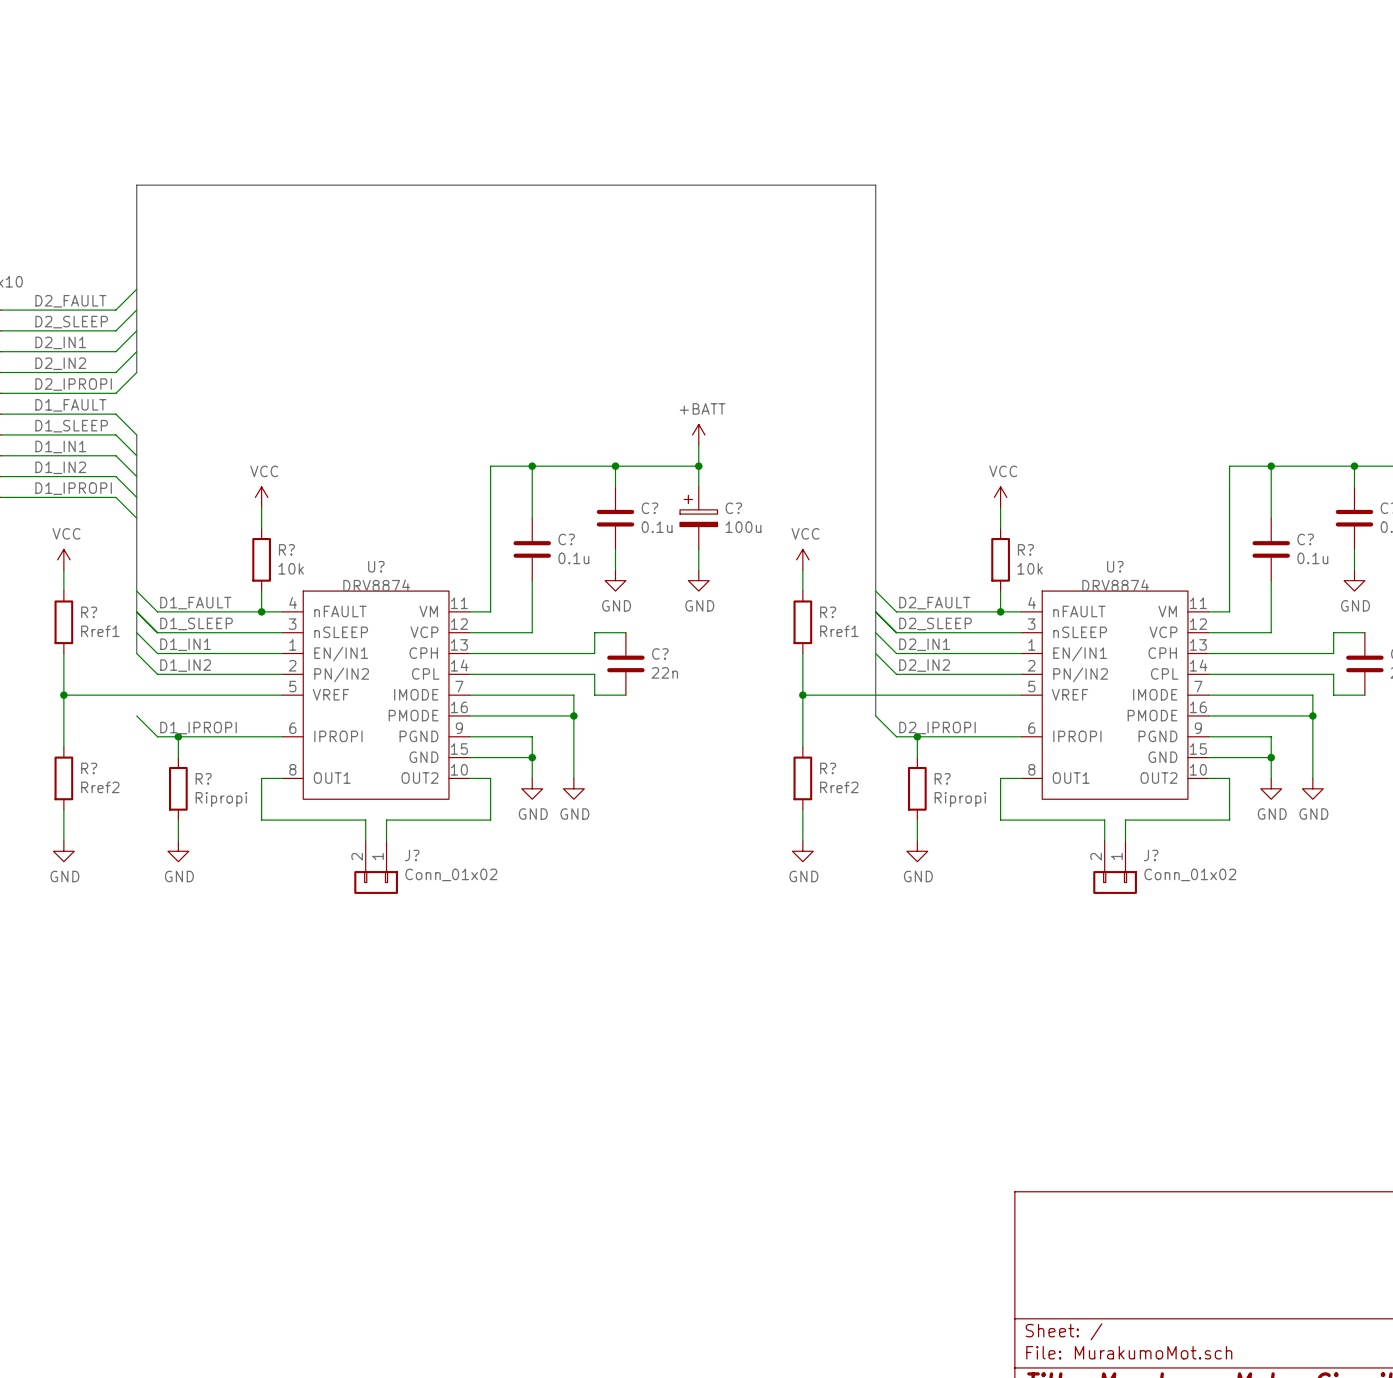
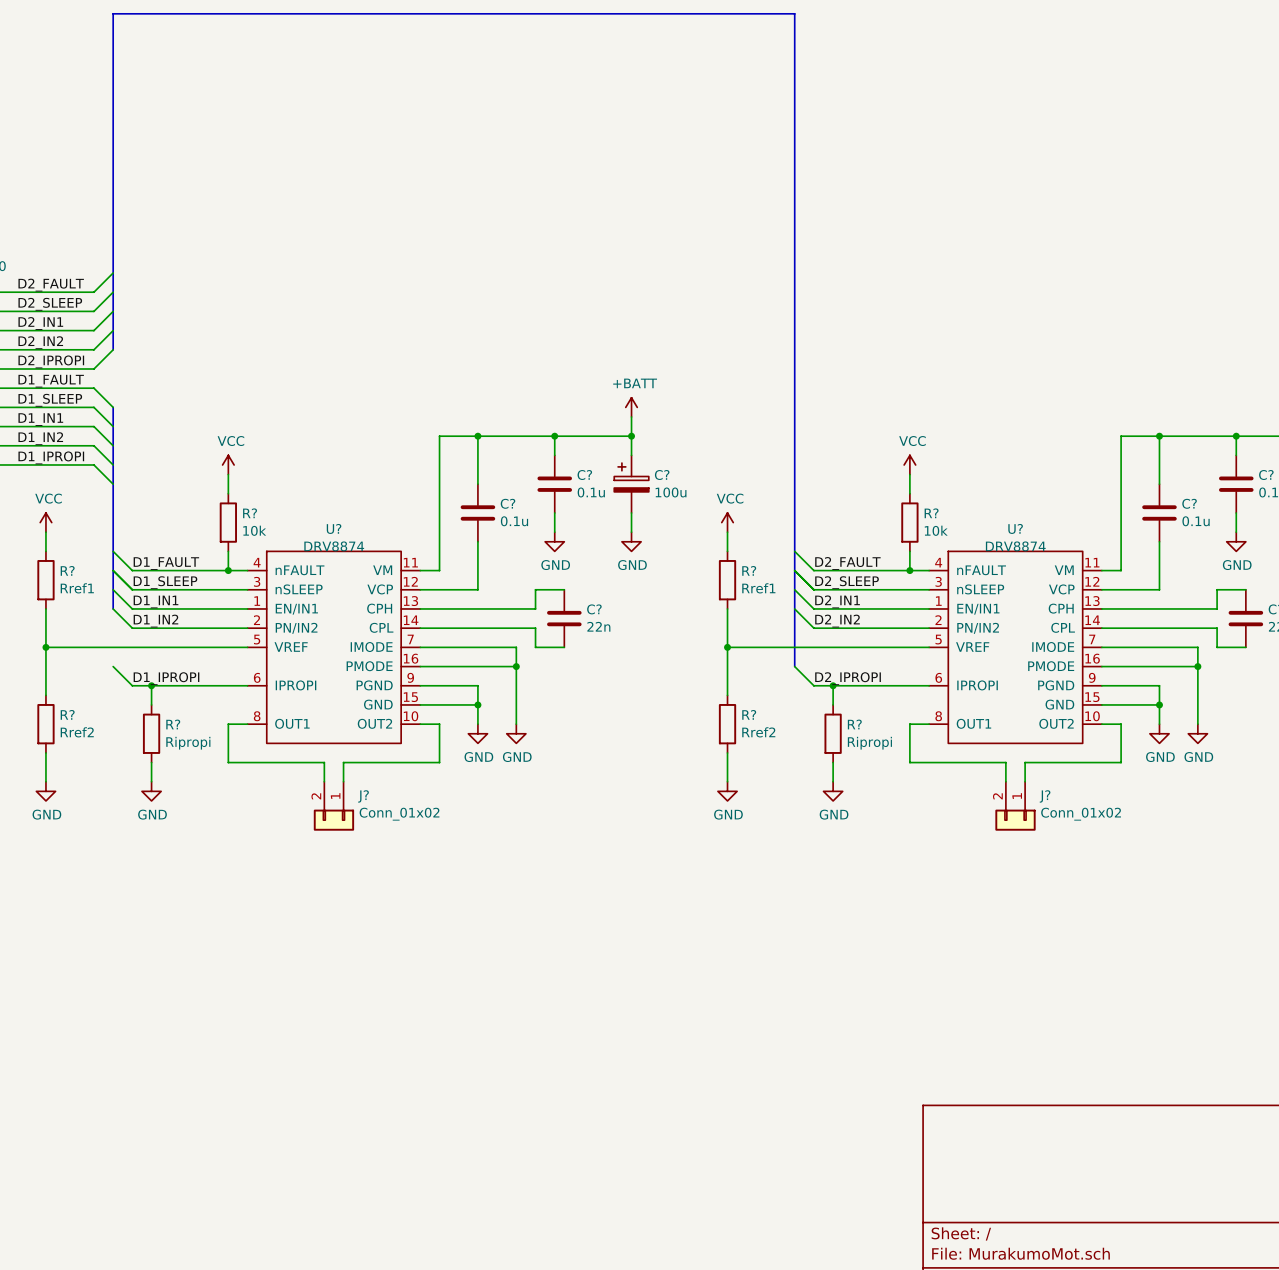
bus: (136, 185) (875, 185) -> (113, 177) (113, 13) (794, 13) (794, 177)

